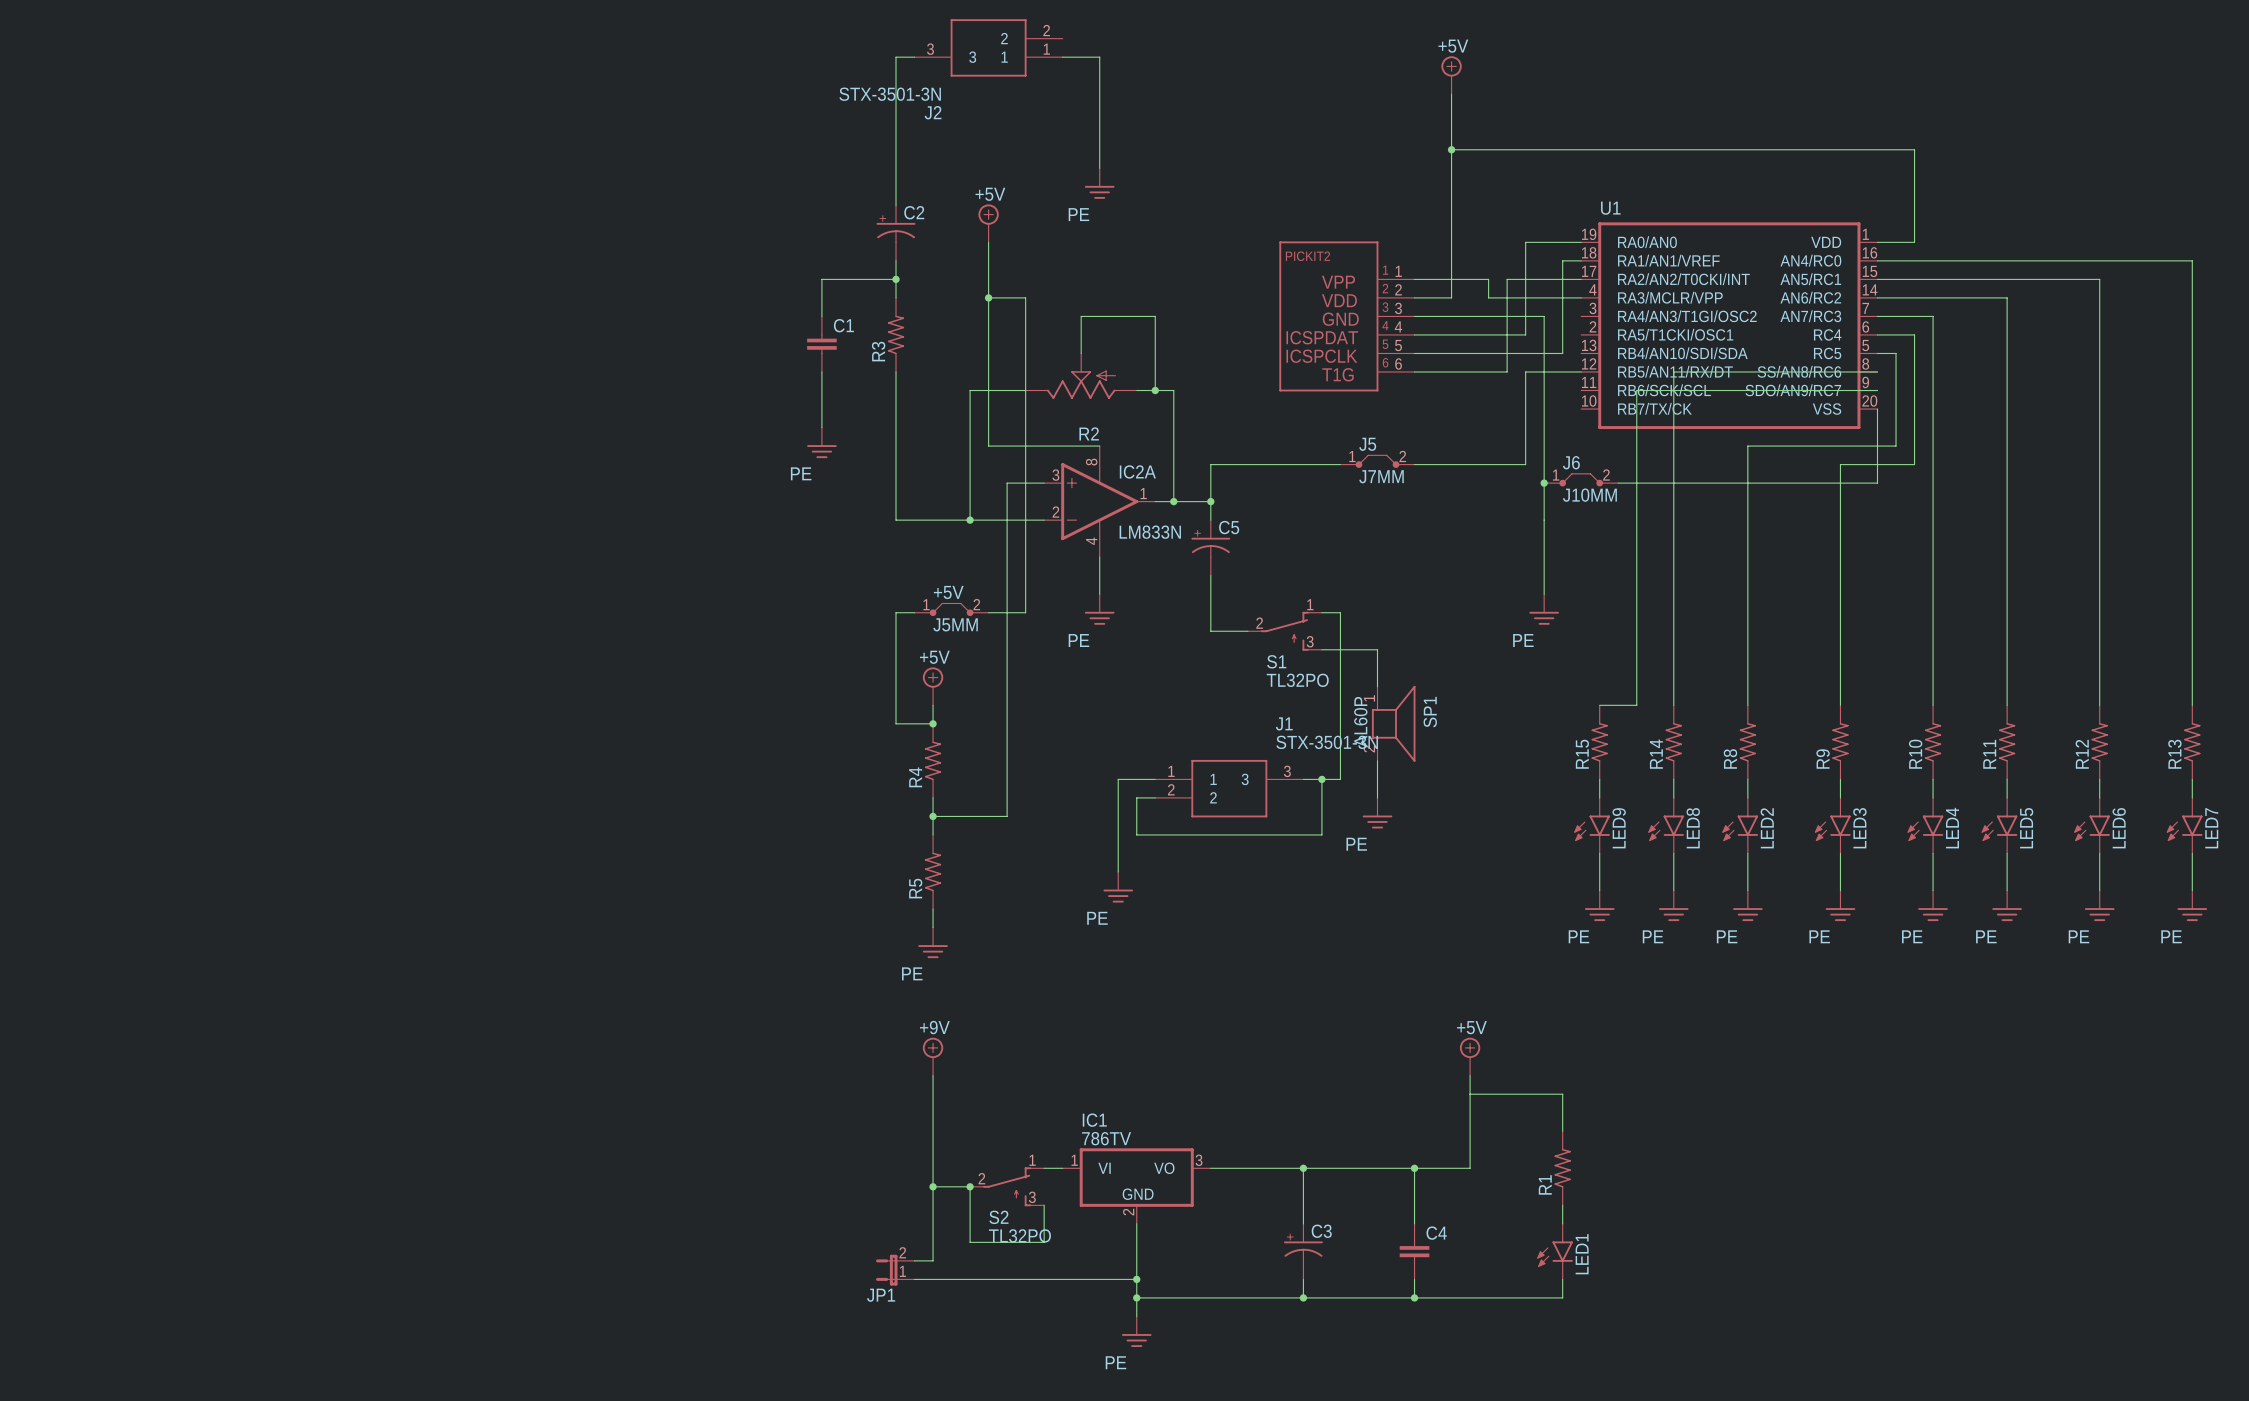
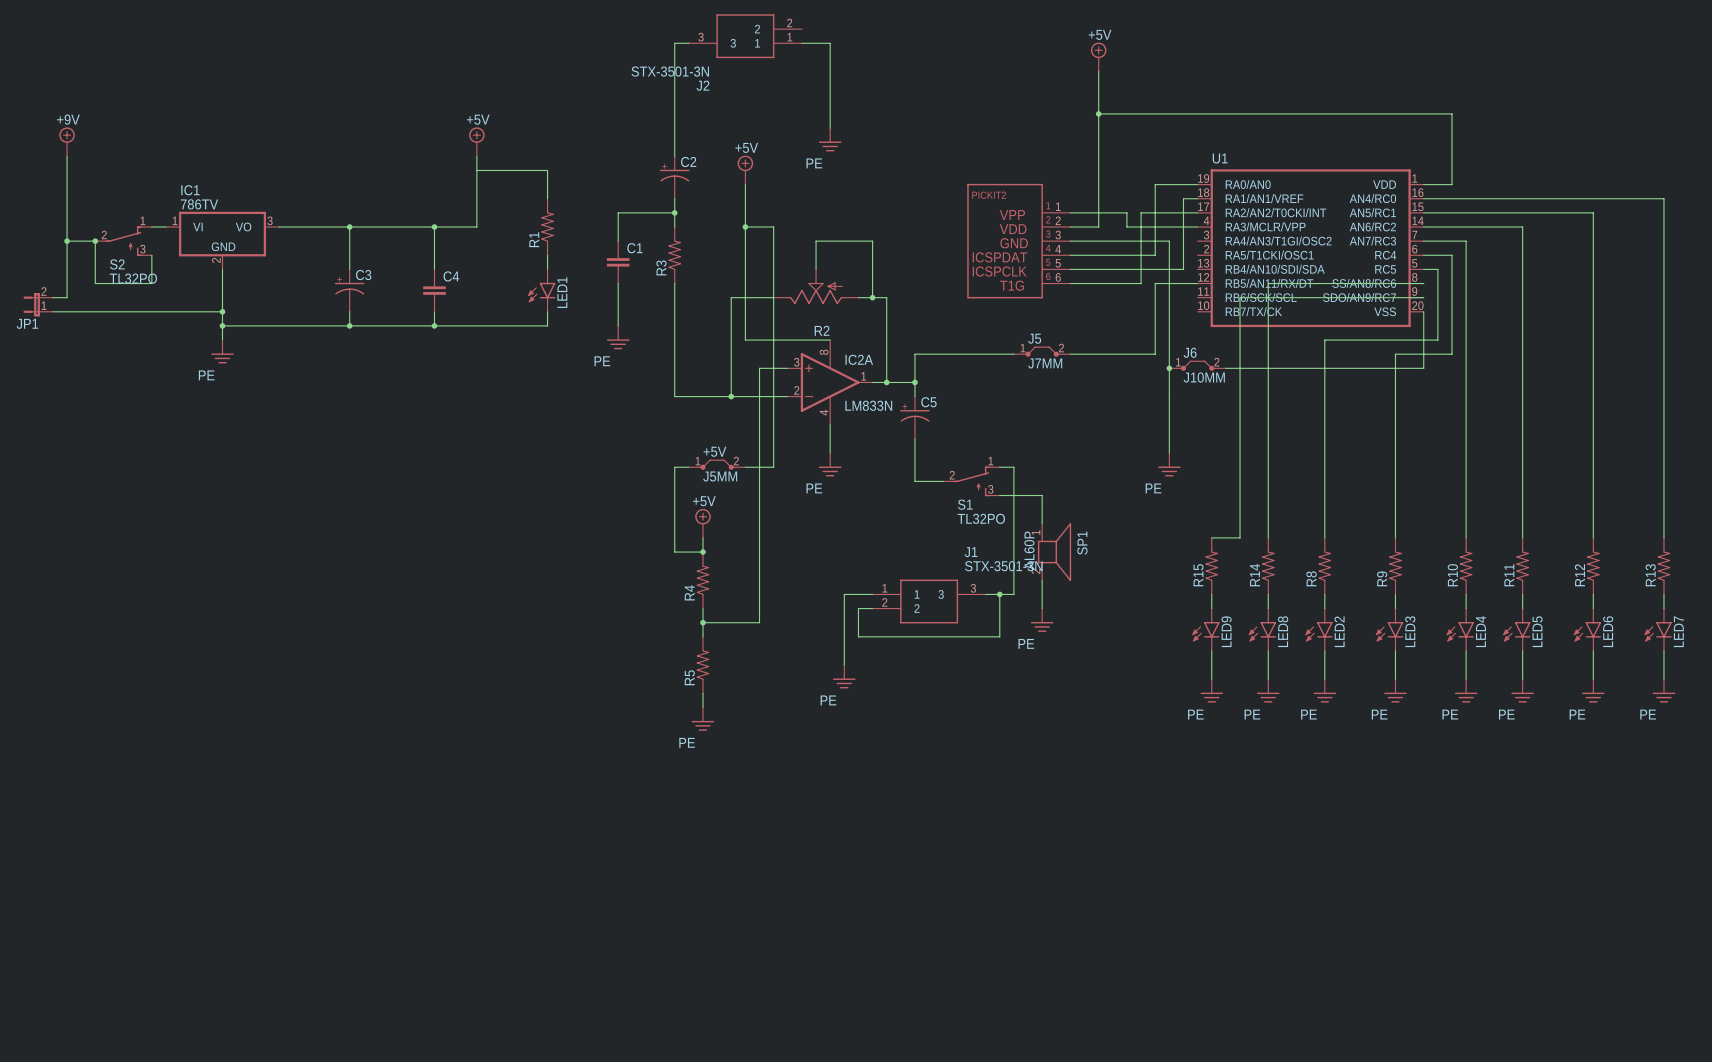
power symbol: none -> +9V (67, 141)
power symbol: none -> +5V (476, 141)
wire: none -> (67, 156) (67, 297) (52, 297)
wire: none -> (476, 156) (476, 227) (279, 227)
wire: none -> (476, 170) (547, 170) (547, 198)
wire: none -> (151, 227) (165, 227)
wire: none -> (349, 227) (349, 269)
junction: none -> (349, 227)
wire: none -> (434, 227) (434, 269)
junction: none -> (434, 227)
wire: none -> (67, 241) (95, 241) (95, 283) (151, 283) (151, 255)
junction: none -> (67, 241)
junction: none -> (95, 241)
wire: none -> (547, 255) (547, 269)
wire: none -> (222, 269) (222, 340)
wire: none -> (52, 311) (222, 311)
junction: none -> (222, 311)
wire: none -> (349, 311) (349, 325)
wire: none -> (434, 311) (434, 325)
wire: none -> (547, 311) (547, 325) (222, 325)
junction: none -> (222, 325)
junction: none -> (349, 325)
junction: none -> (434, 325)
power symbol: none -> PE (222, 351)
power symbol: +9V (933, 1056) -> none
power symbol: +5V (1470, 1056) -> none
wire: (933, 1075) (933, 1260) (914, 1260) -> none
wire: (1470, 1075) (1470, 1168) (1210, 1168) -> none
wire: (1470, 1094) (1562, 1094) (1562, 1131) -> none
wire: (1044, 1168) (1062, 1168) -> none
wire: (1303, 1168) (1303, 1223) -> none
junction: (1303, 1168) -> none
wire: (1414, 1168) (1414, 1223) -> none
junction: (1414, 1168) -> none
R1 position: (1562, 1168) -> (547, 227)
wire: (933, 1186) (970, 1186) (970, 1242) (1044, 1242) (1044, 1205) -> none
junction: (933, 1186) -> none
junction: (970, 1186) -> none
S2 position: (1007, 1186) -> (123, 241)
IC1 position: (1136, 1186) -> (222, 240)
wire: (1562, 1205) (1562, 1223) -> none
wire: (1136, 1223) (1136, 1316) -> none
C3 position: (1303, 1251) -> (349, 290)
C4 position: (1414, 1251) -> (434, 290)
LED1 position: (1554, 1251) -> (541, 290)
JP1 position: (895, 1270) -> (38, 304)
wire: (914, 1279) (1136, 1279) -> none
junction: (1136, 1279) -> none
wire: (1303, 1279) (1303, 1297) -> none
wire: (1414, 1279) (1414, 1297) -> none
wire: (1562, 1279) (1562, 1297) (1136, 1297) -> none
junction: (1136, 1297) -> none
junction: (1303, 1297) -> none
junction: (1414, 1297) -> none
power symbol: PE (1136, 1331) -> none

